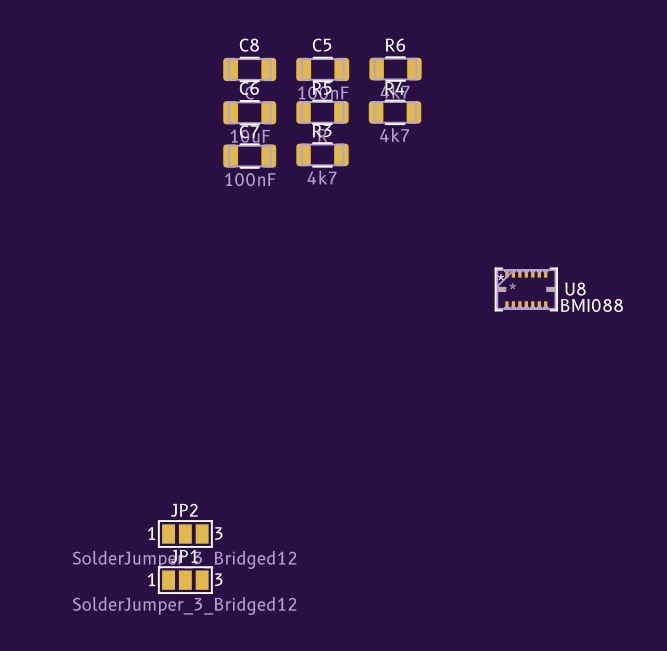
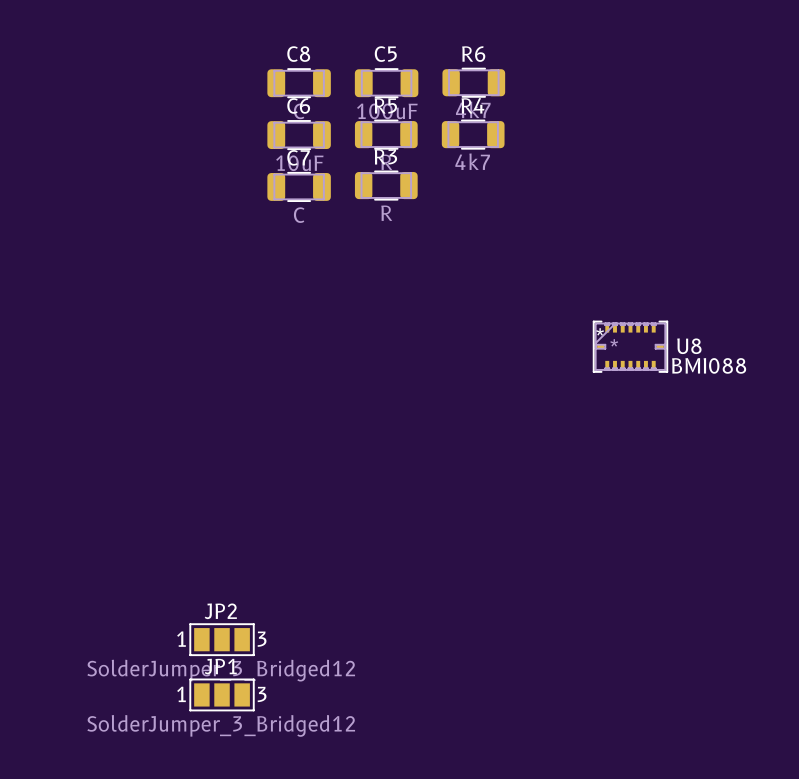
C5 value: 100nF (323, 92) -> 100uF (387, 111)
R3 value: 4k7 (322, 177) -> R (386, 213)
C7 value: 100nF (250, 179) -> C (299, 215)

